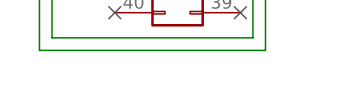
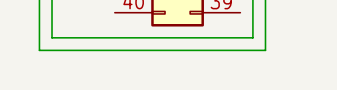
no-connect mark: (114, 12) -> none
no-connect mark: (240, 12) -> none

